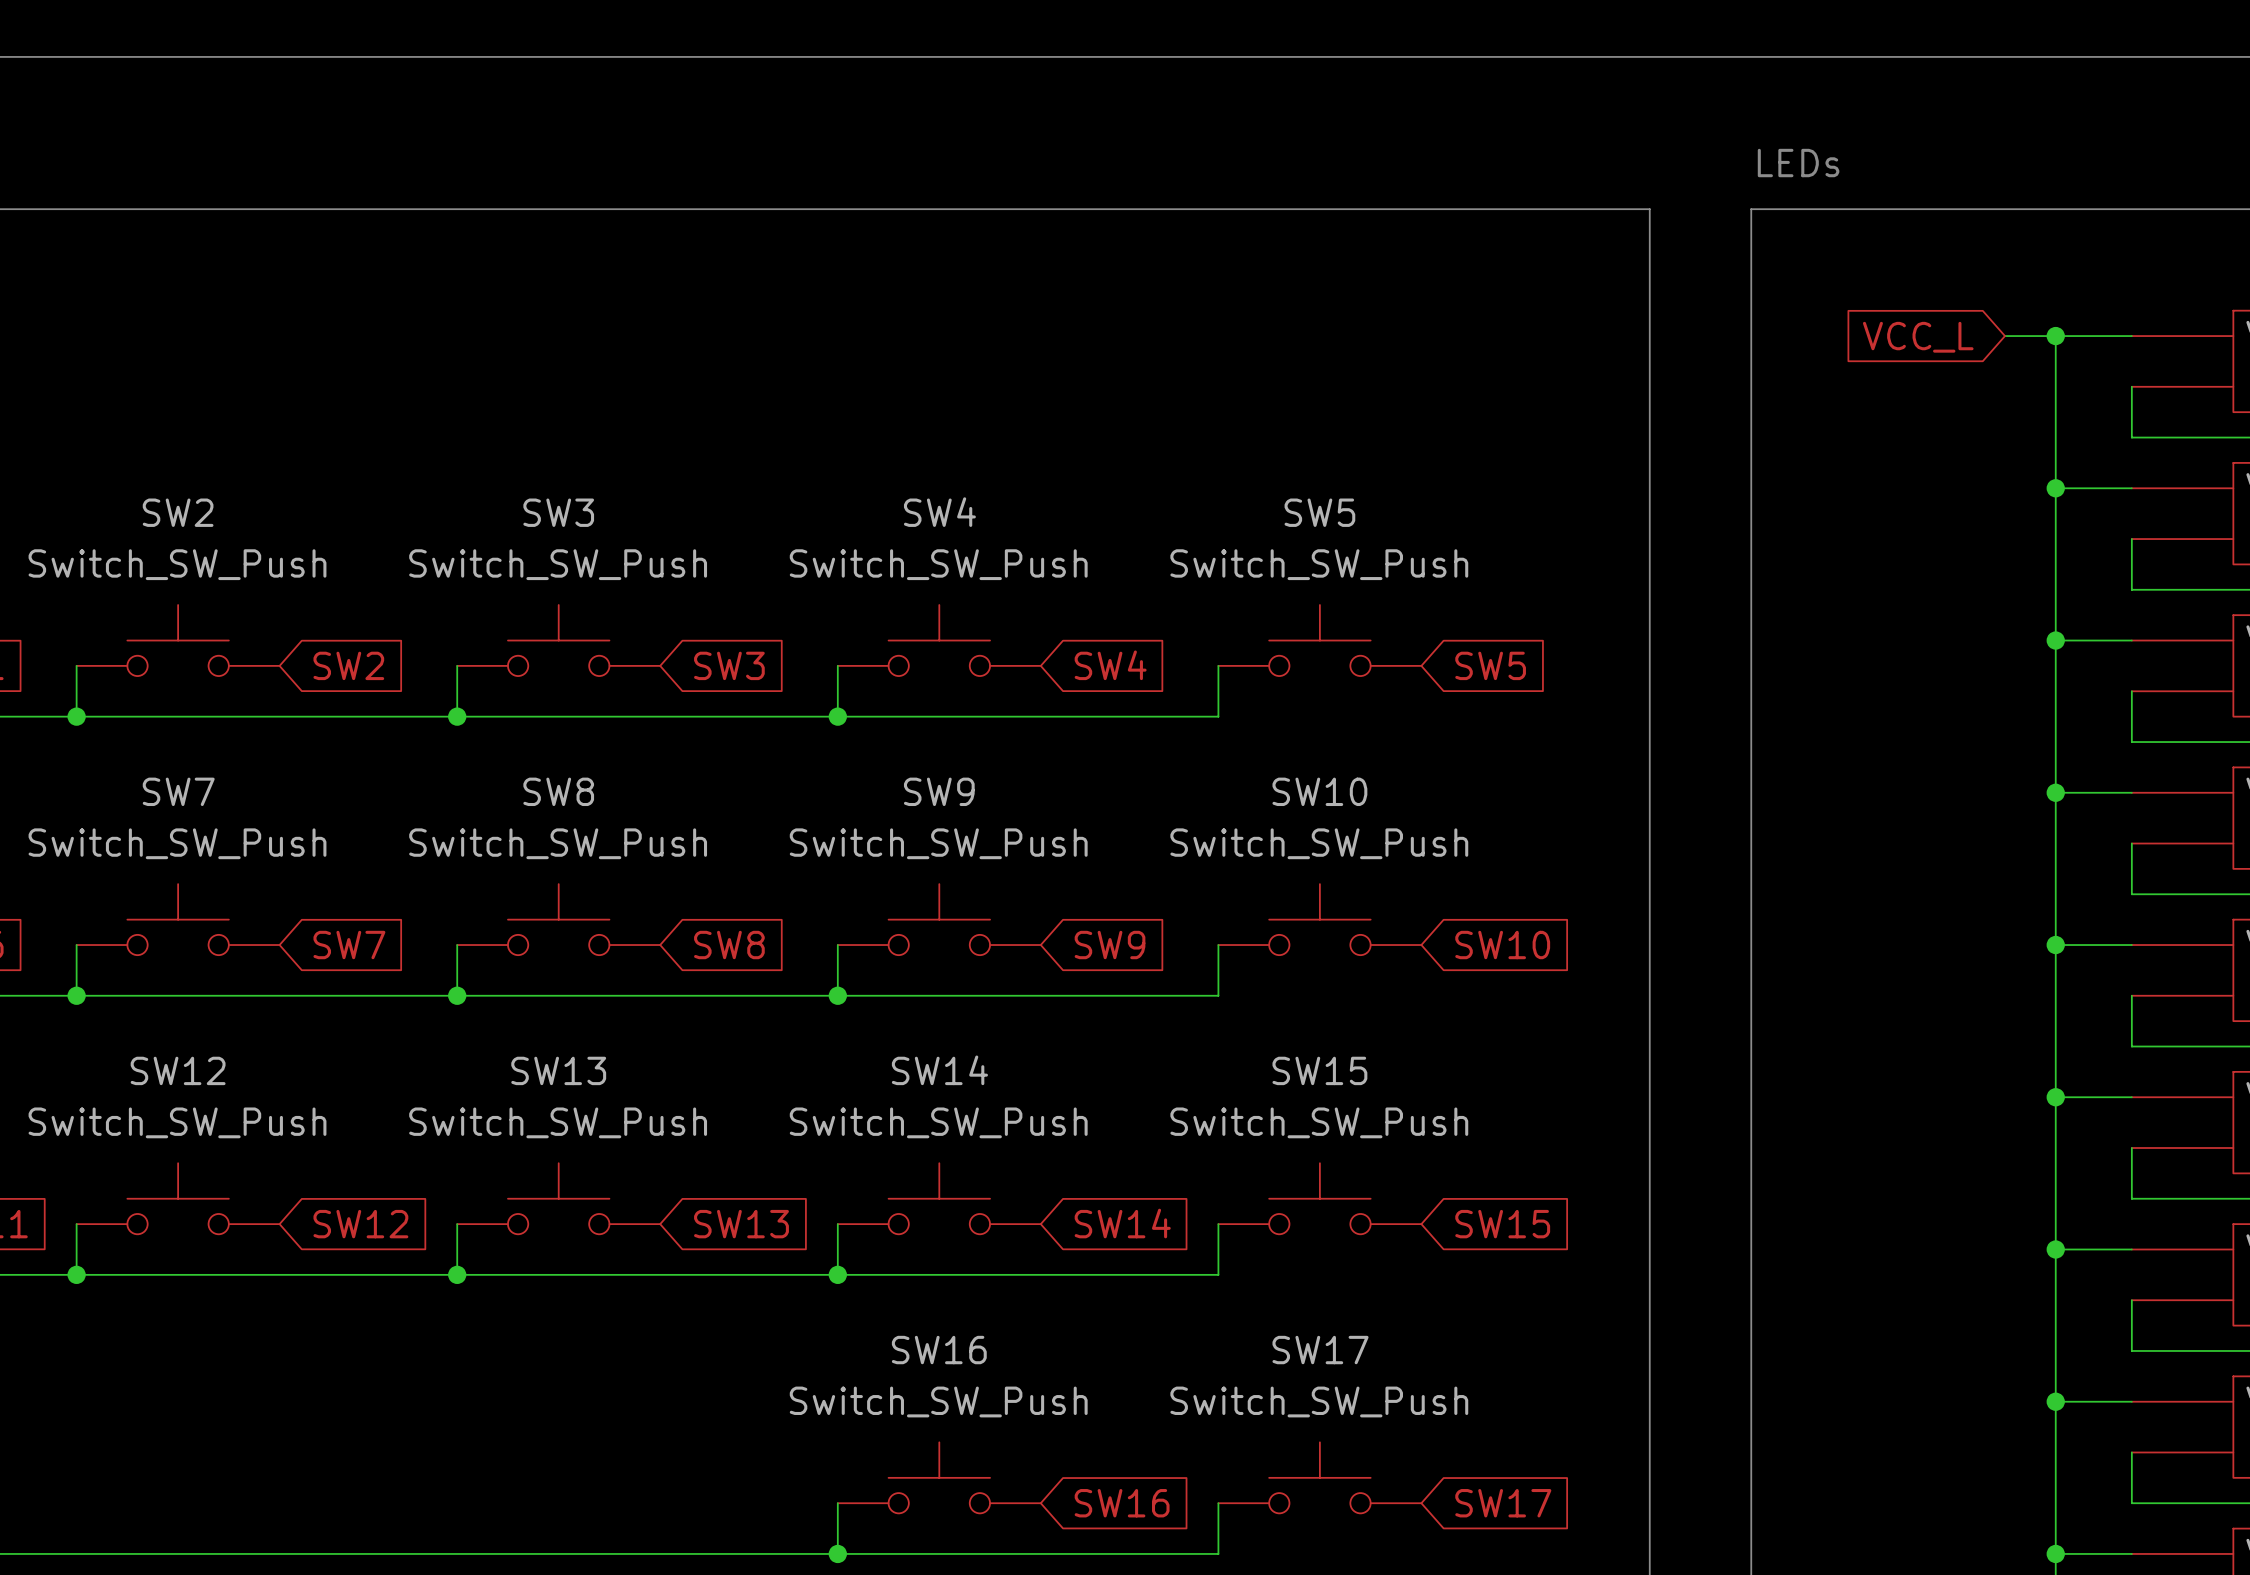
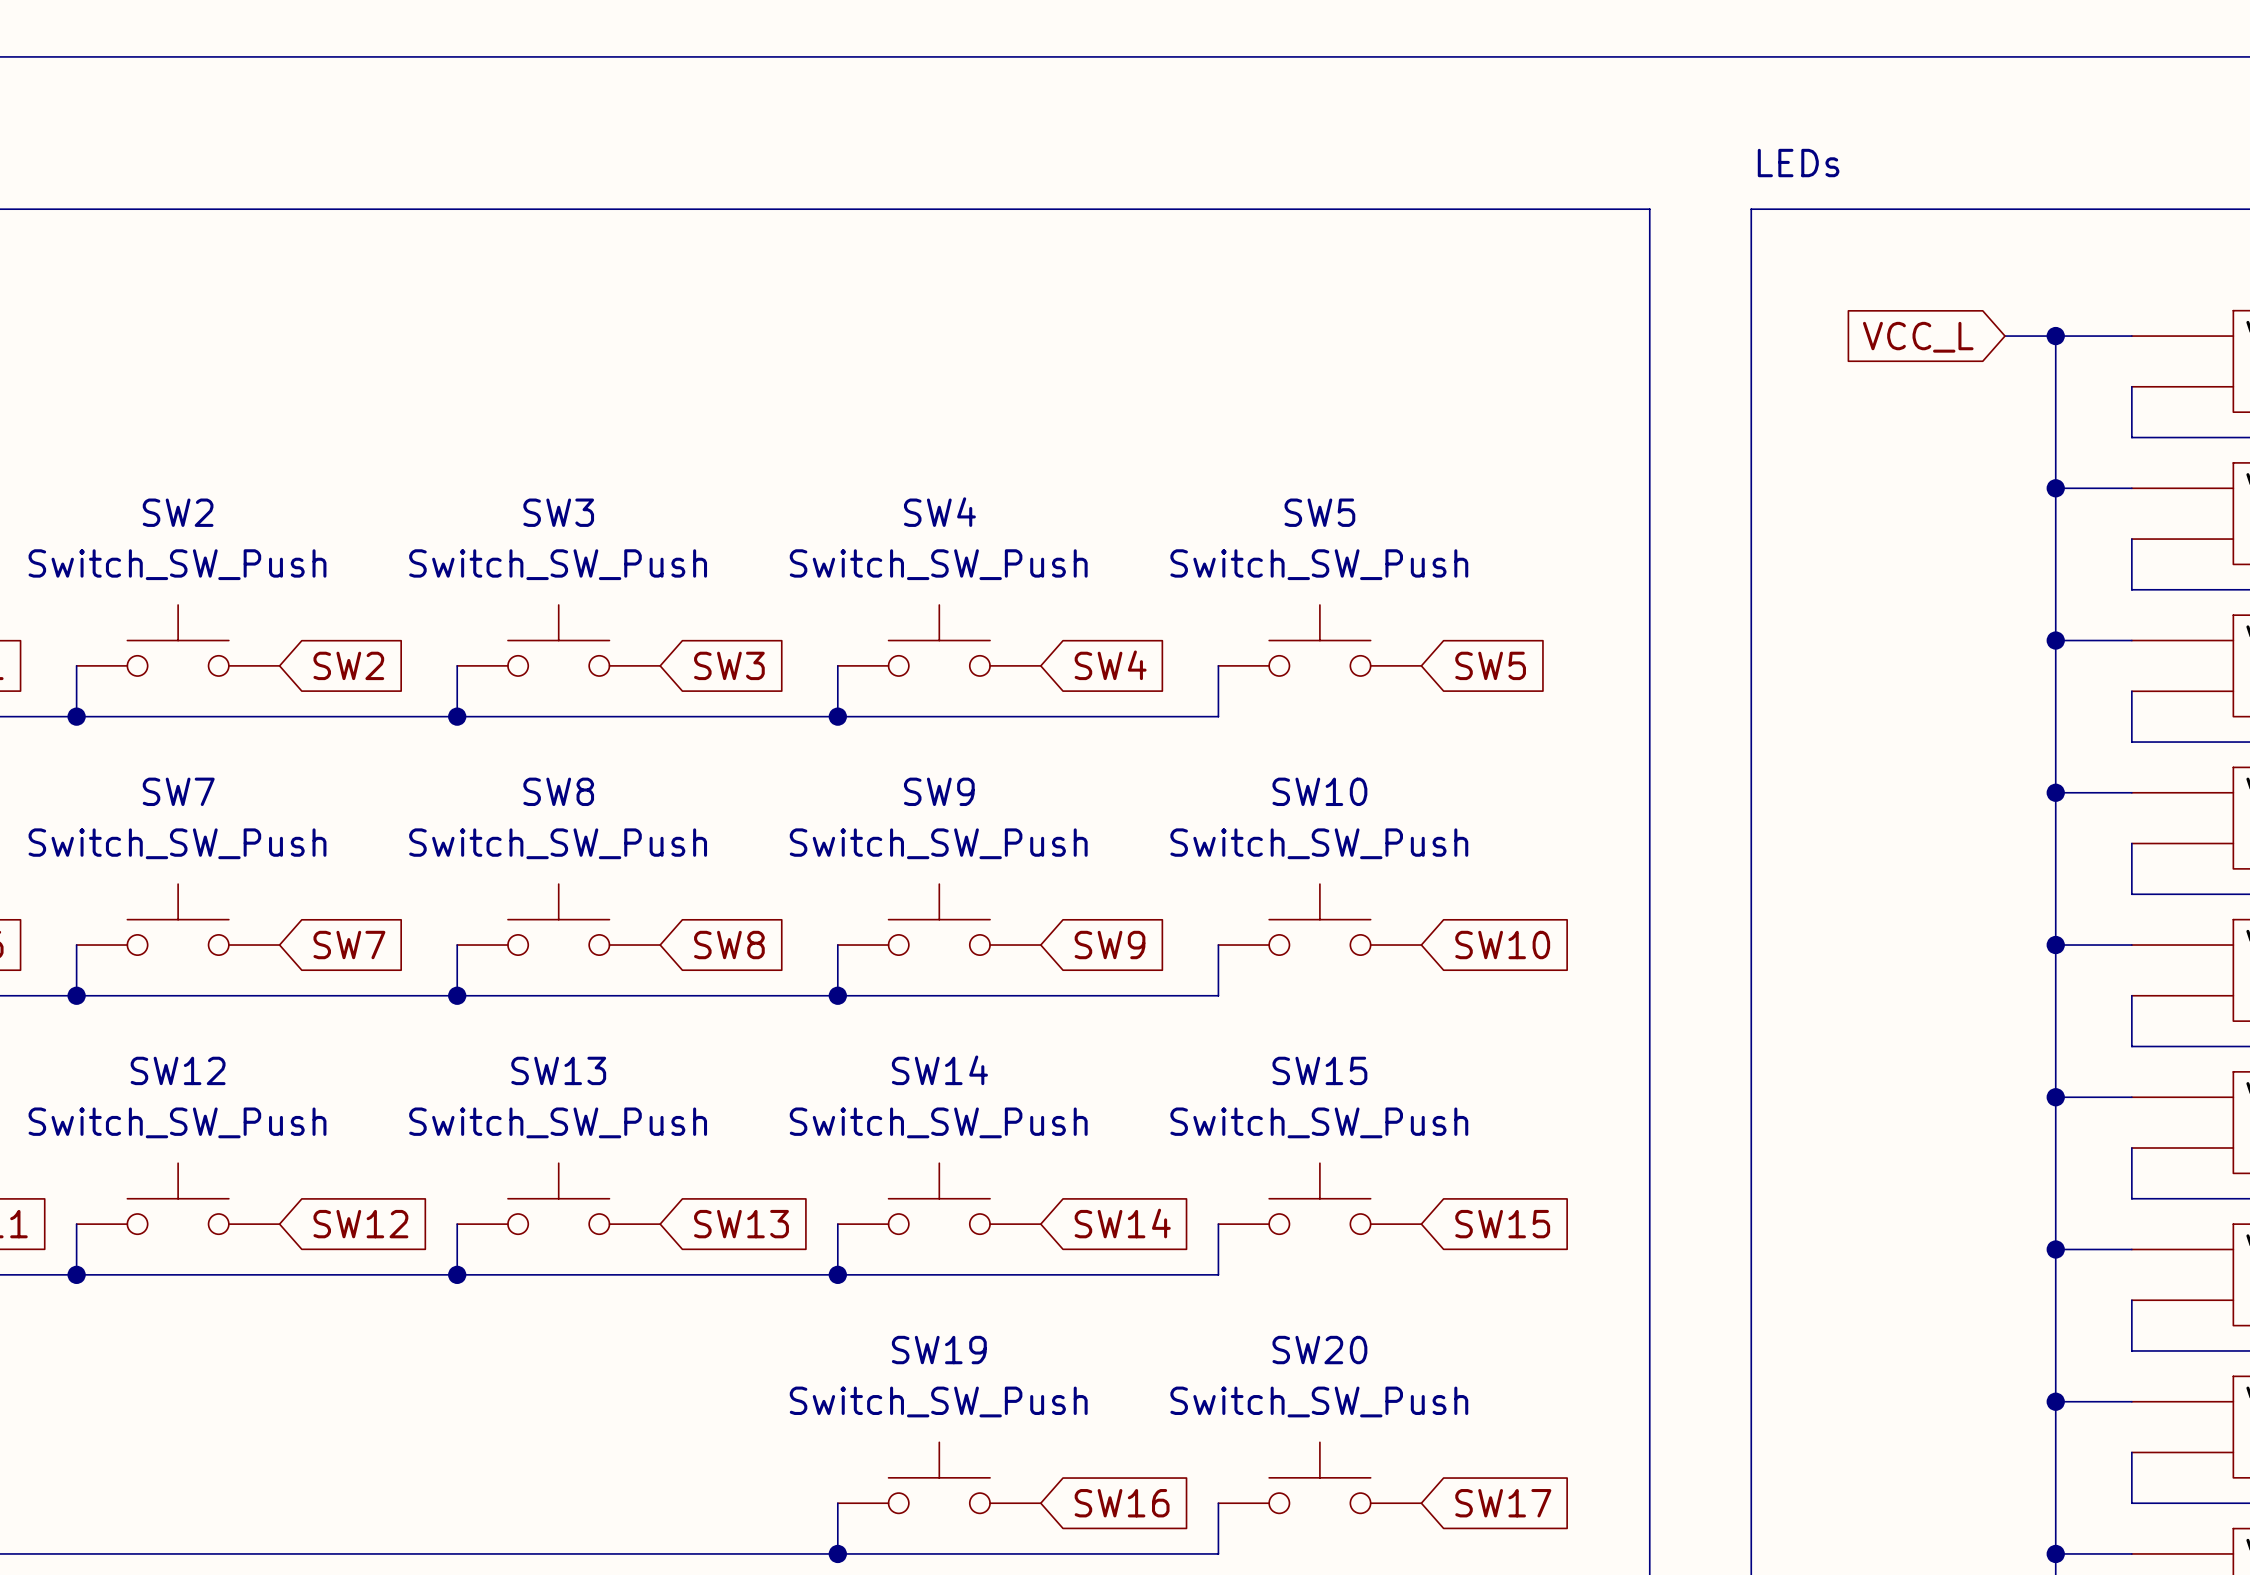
SW16 name: SW16 (939, 1350) -> SW19 (939, 1350)
SW17 name: SW17 (1320, 1350) -> SW20 (1319, 1350)

